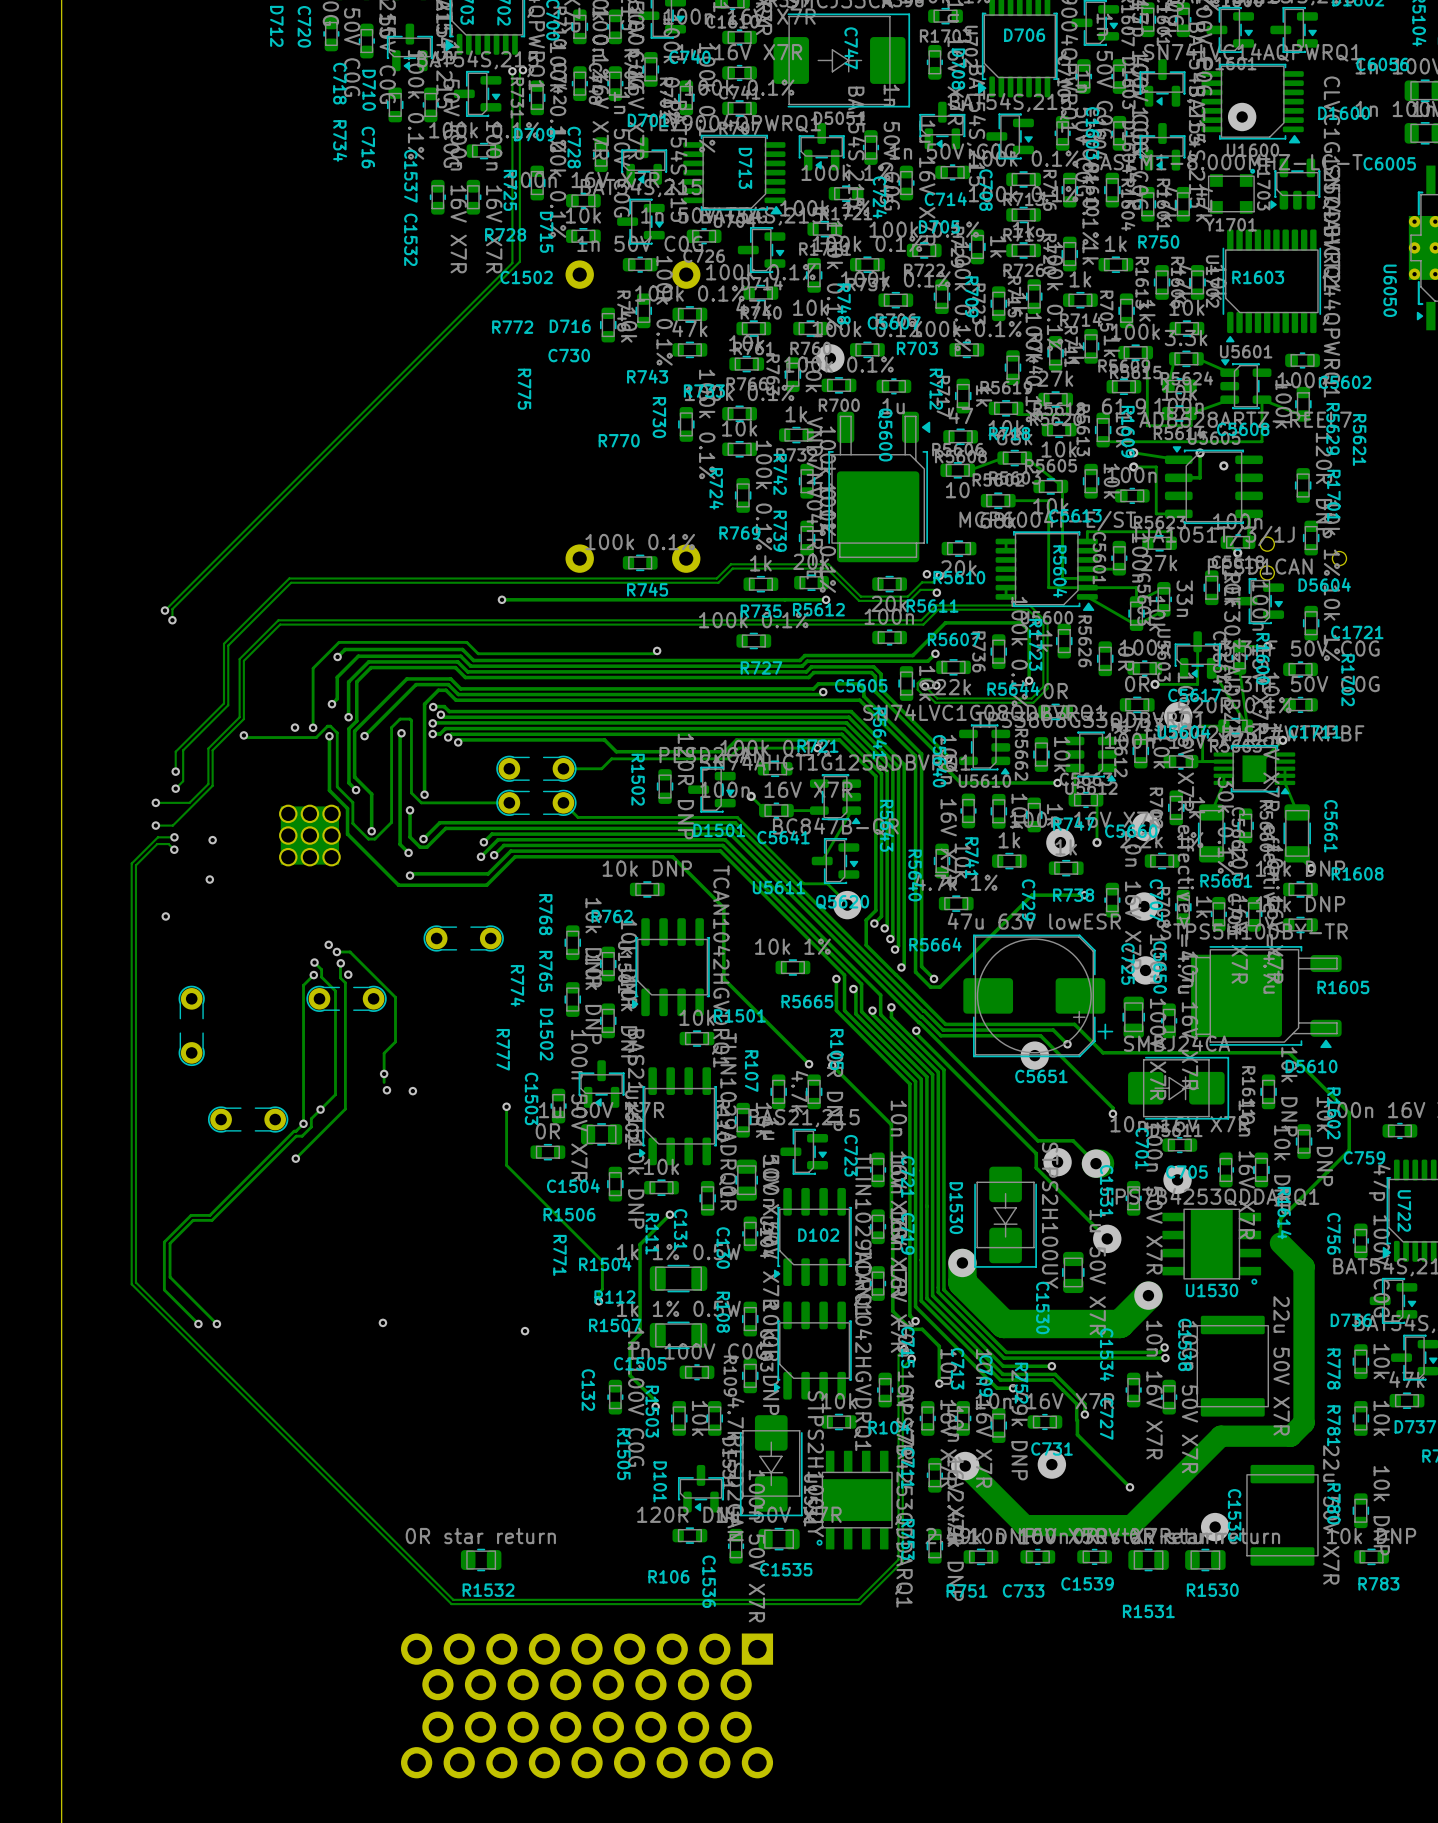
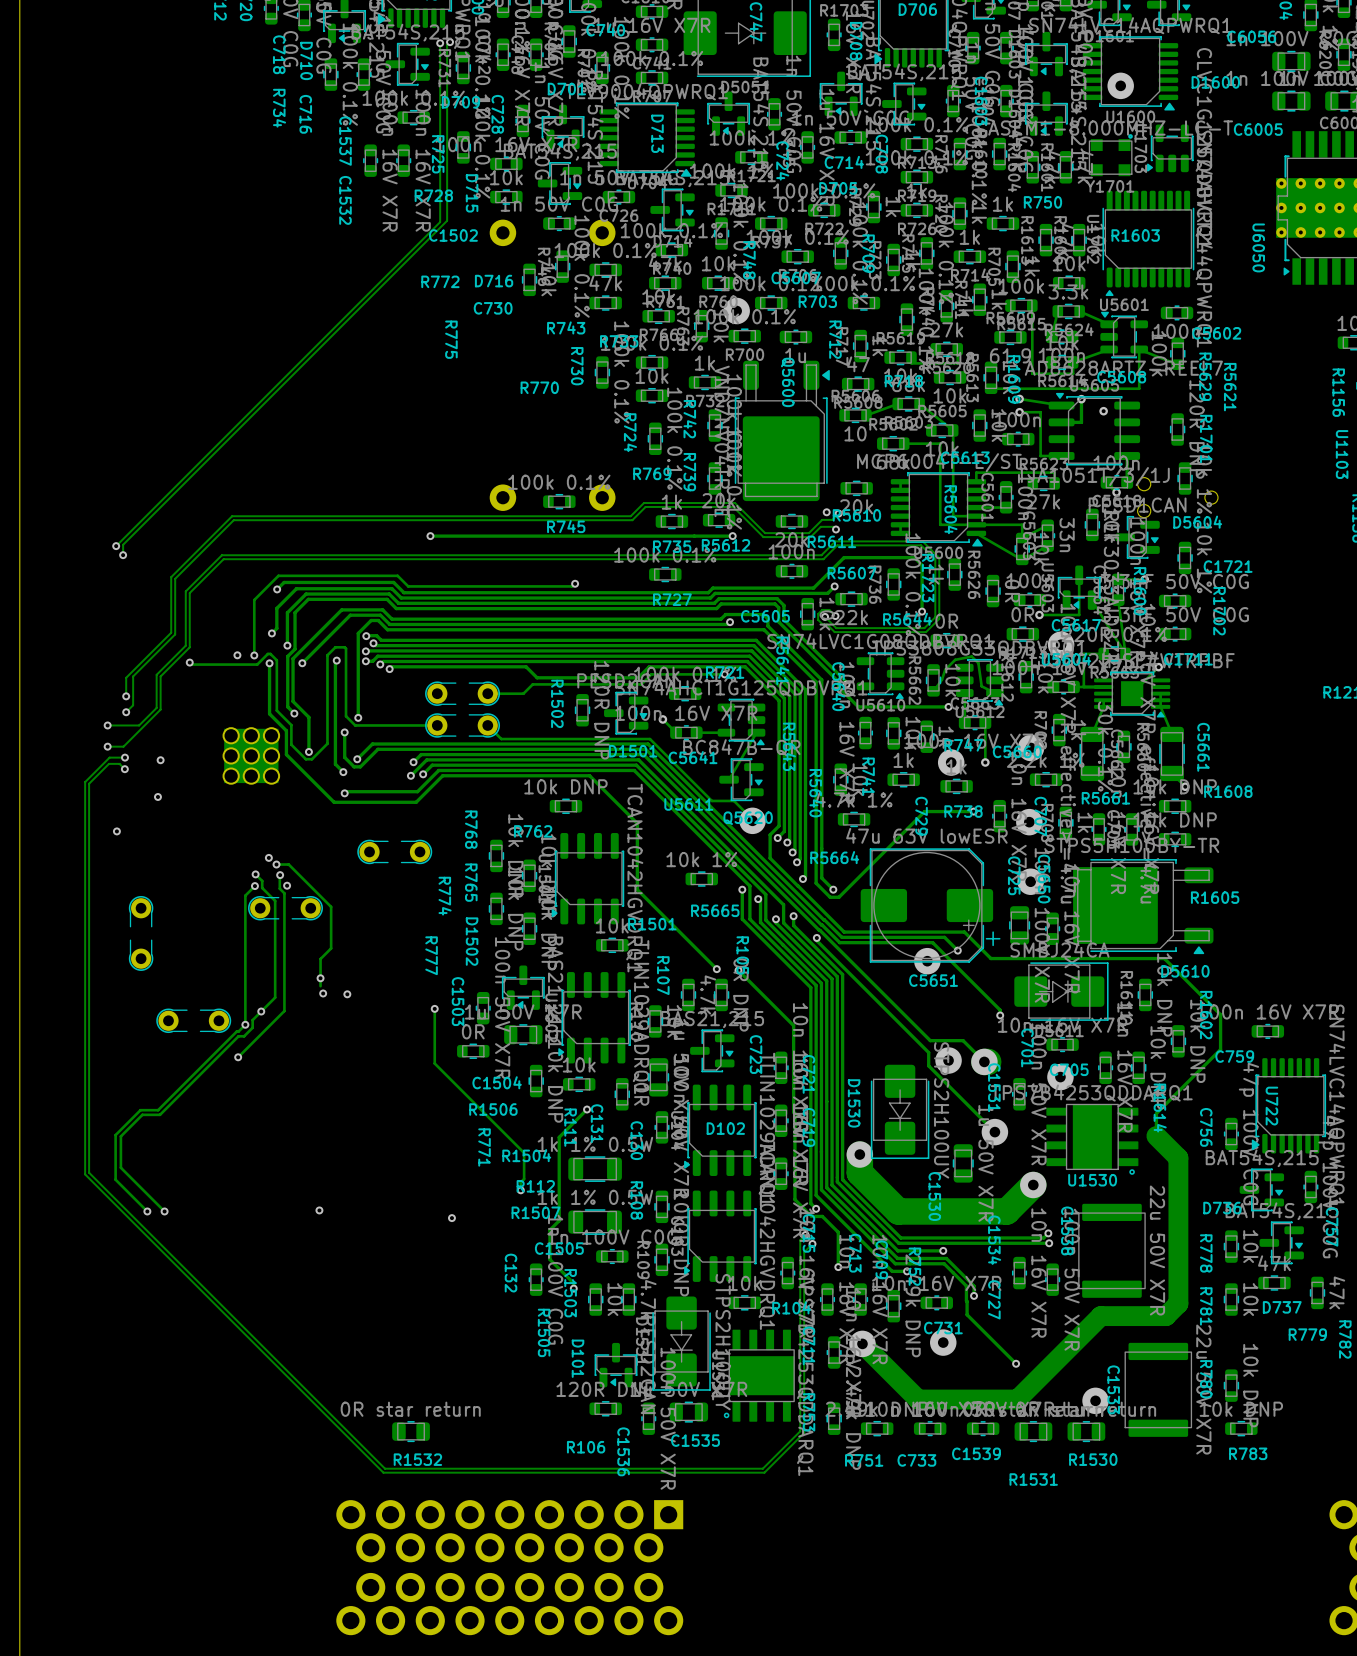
track: none -> (933, 691) (941, 679) (945, 669) (955, 659) (971, 656) (978, 663) (981, 686) (994, 692)

